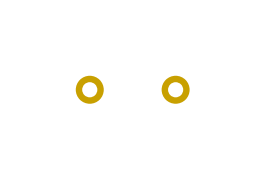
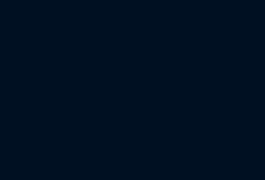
part: (132, 89) -> none

